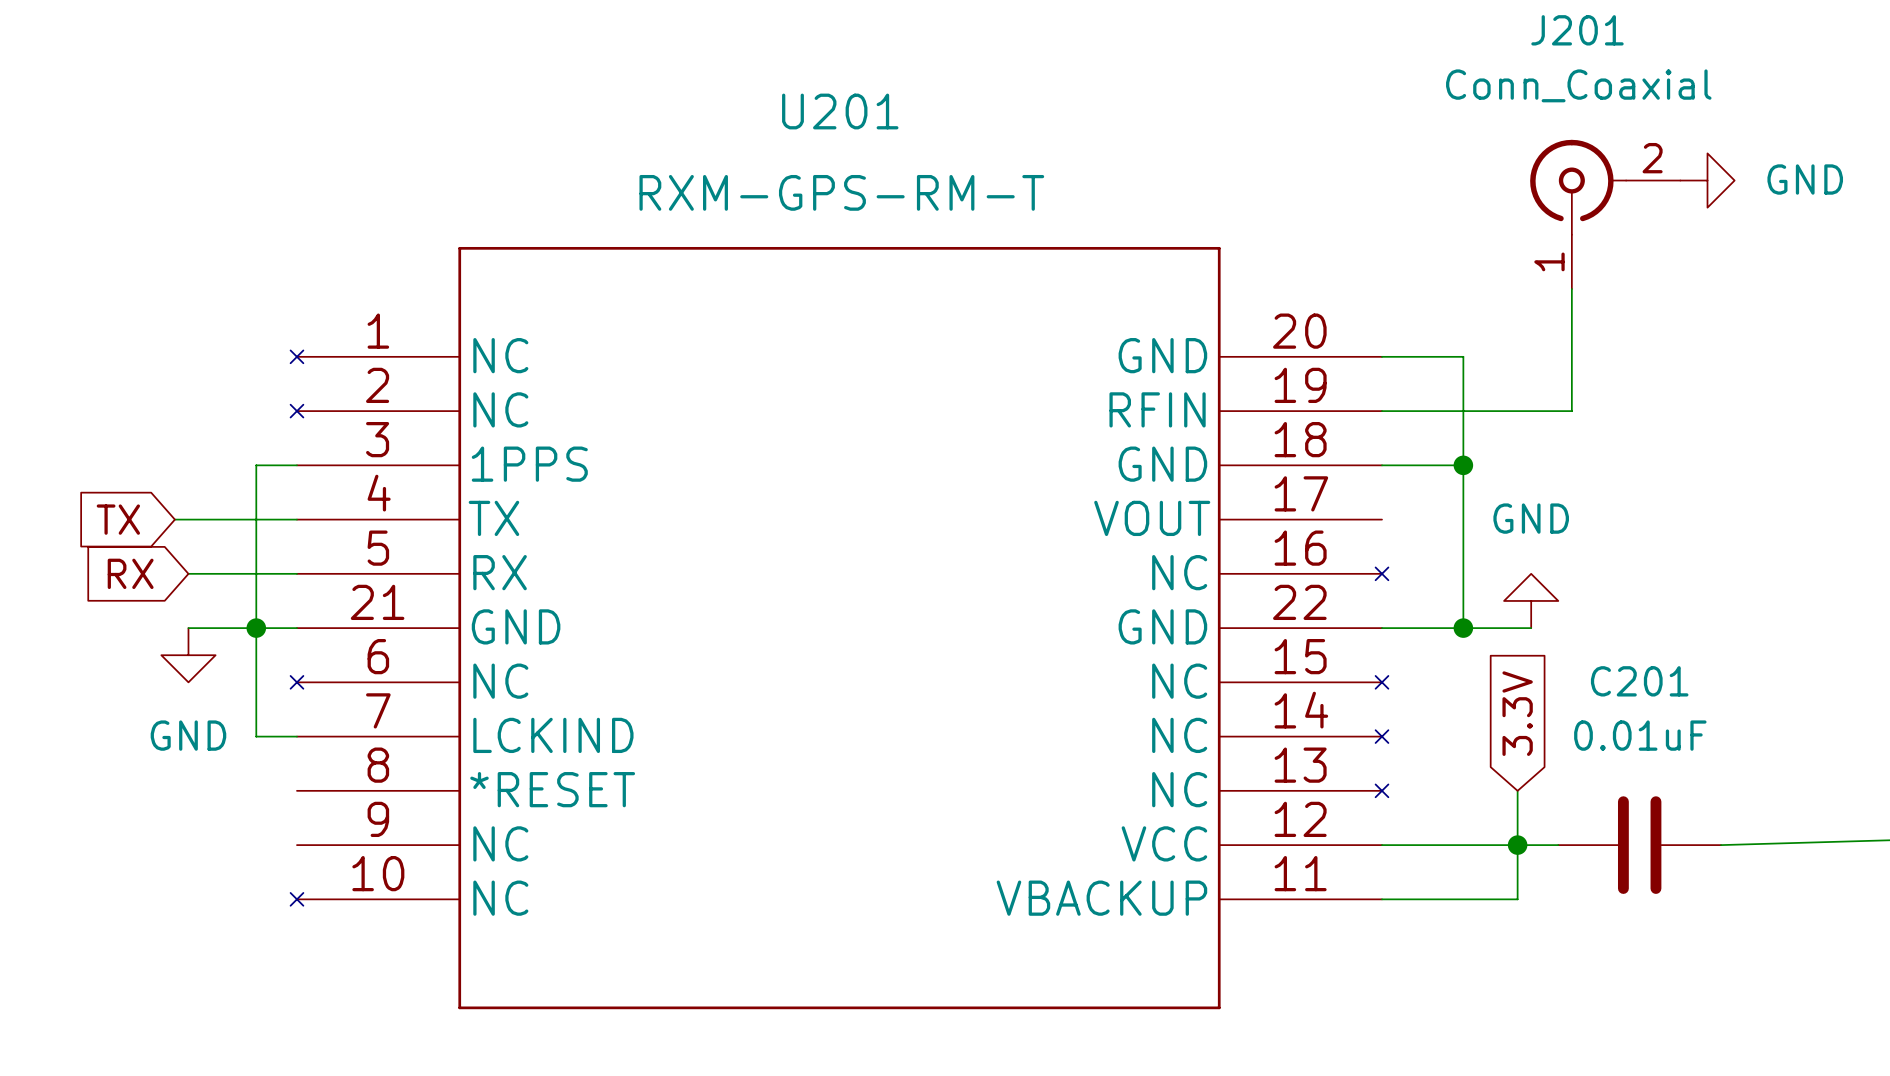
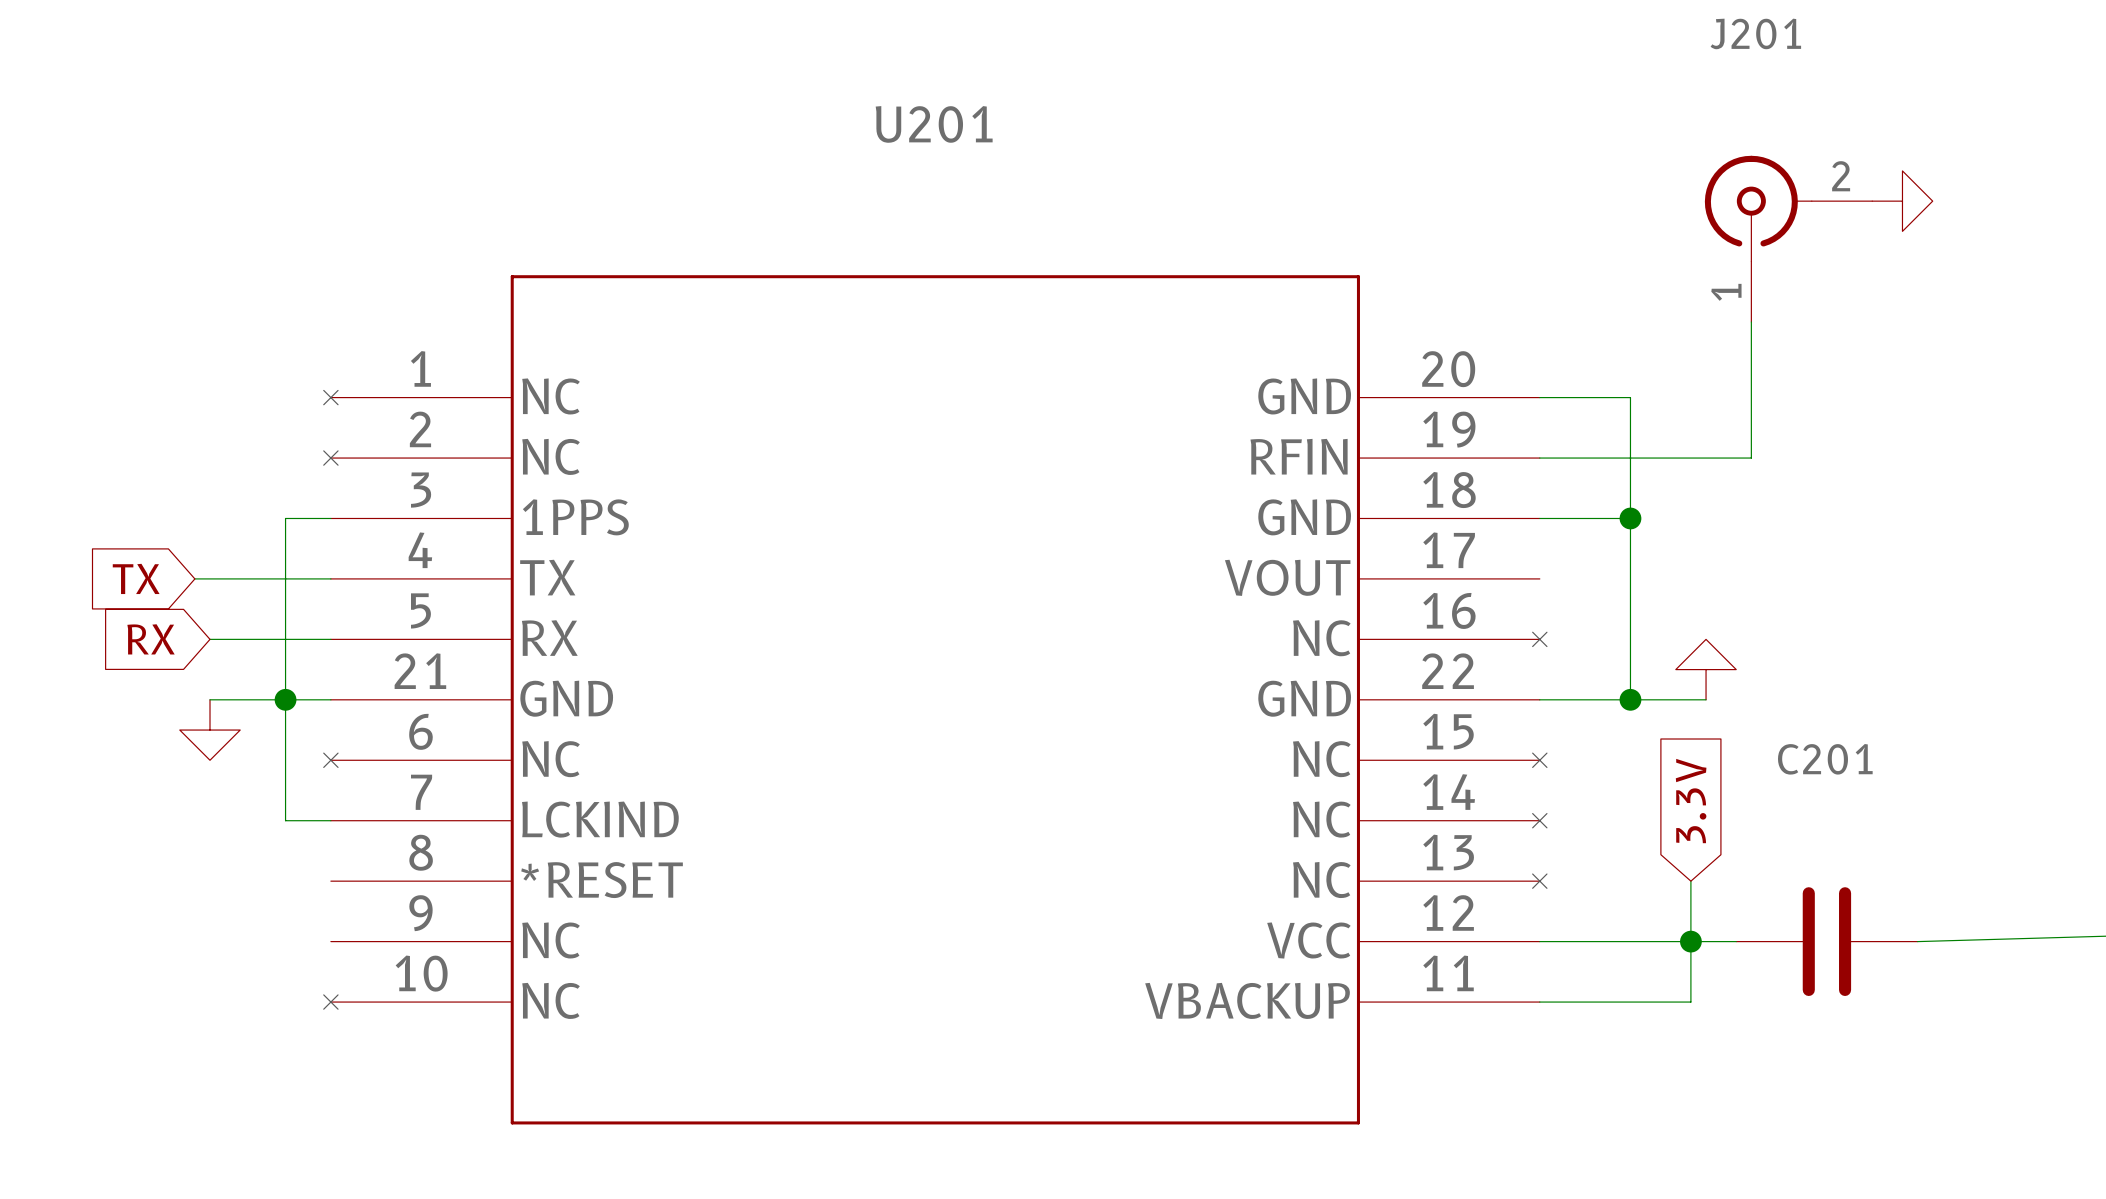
J201 value: Conn_Coaxial (1578, 85) -> none
power symbol text: GND (1805, 179) -> none
U201 value: RXM-GPS-RM-T (841, 192) -> none
power symbol text: GND (1531, 518) -> none
power symbol text: GND (188, 735) -> none
C201 value: 0.01uF (1640, 735) -> none

